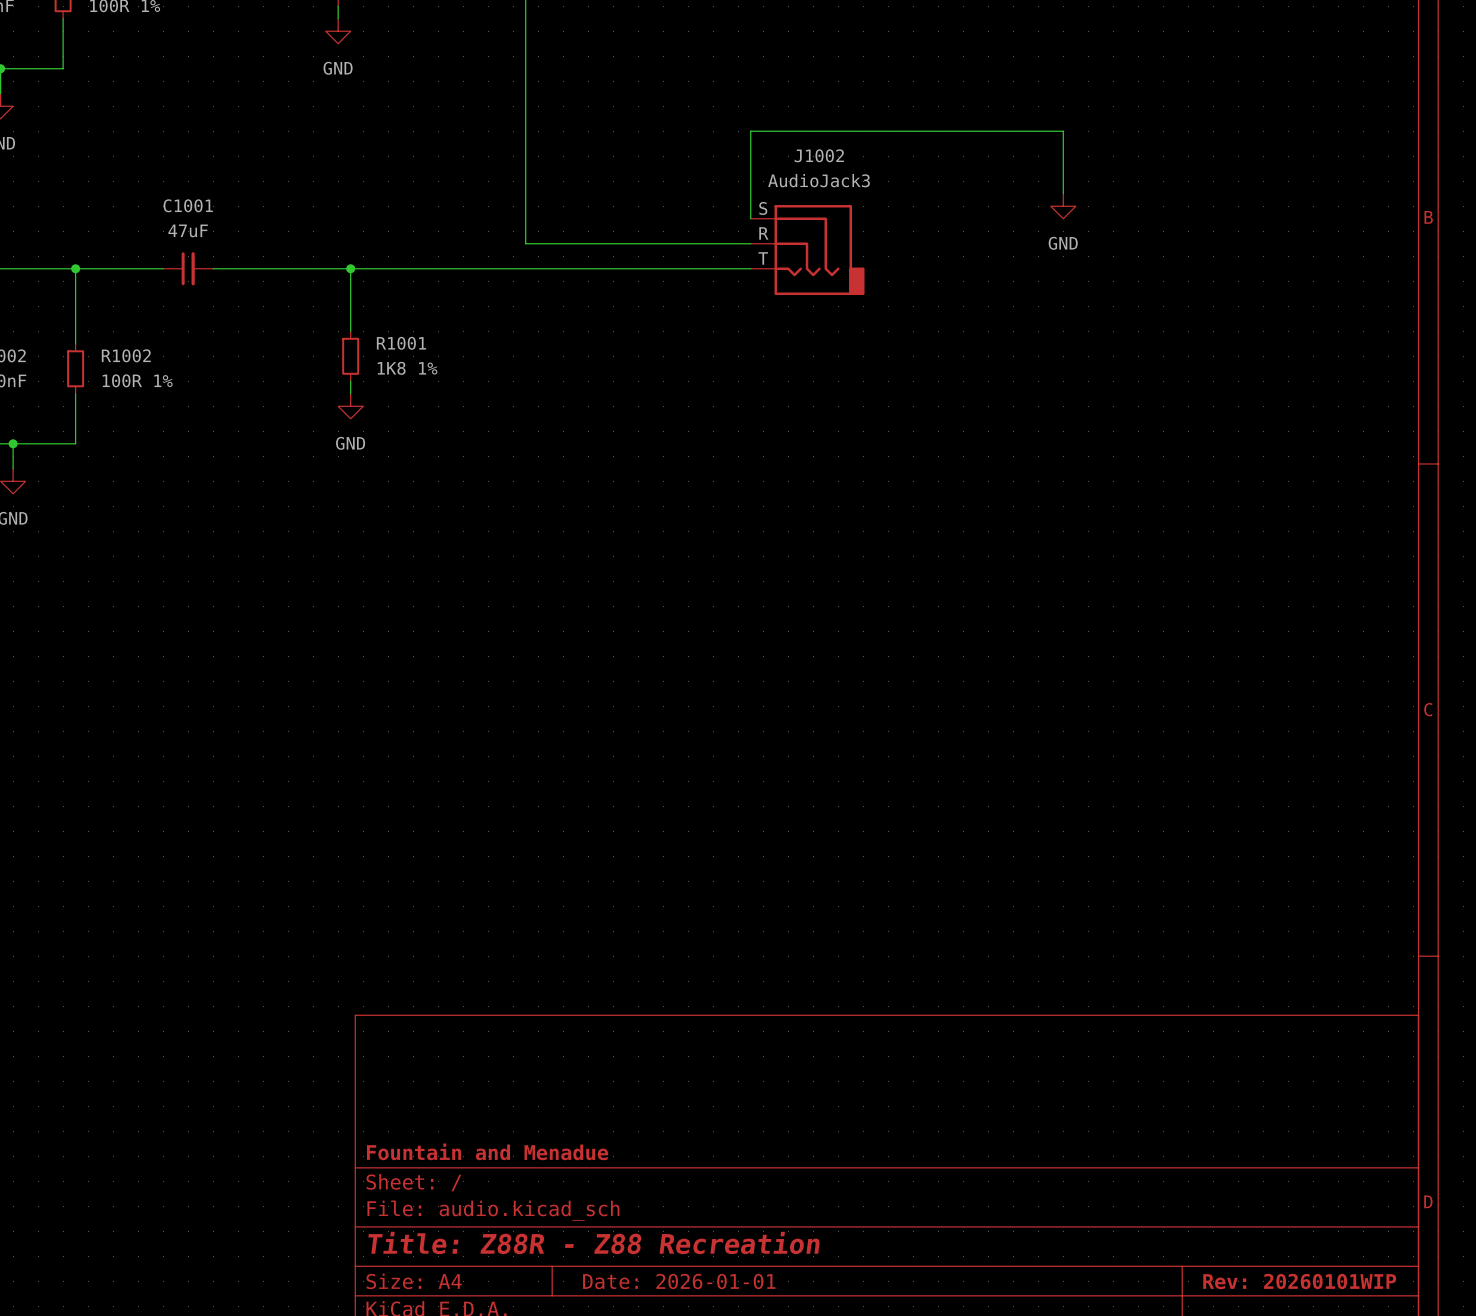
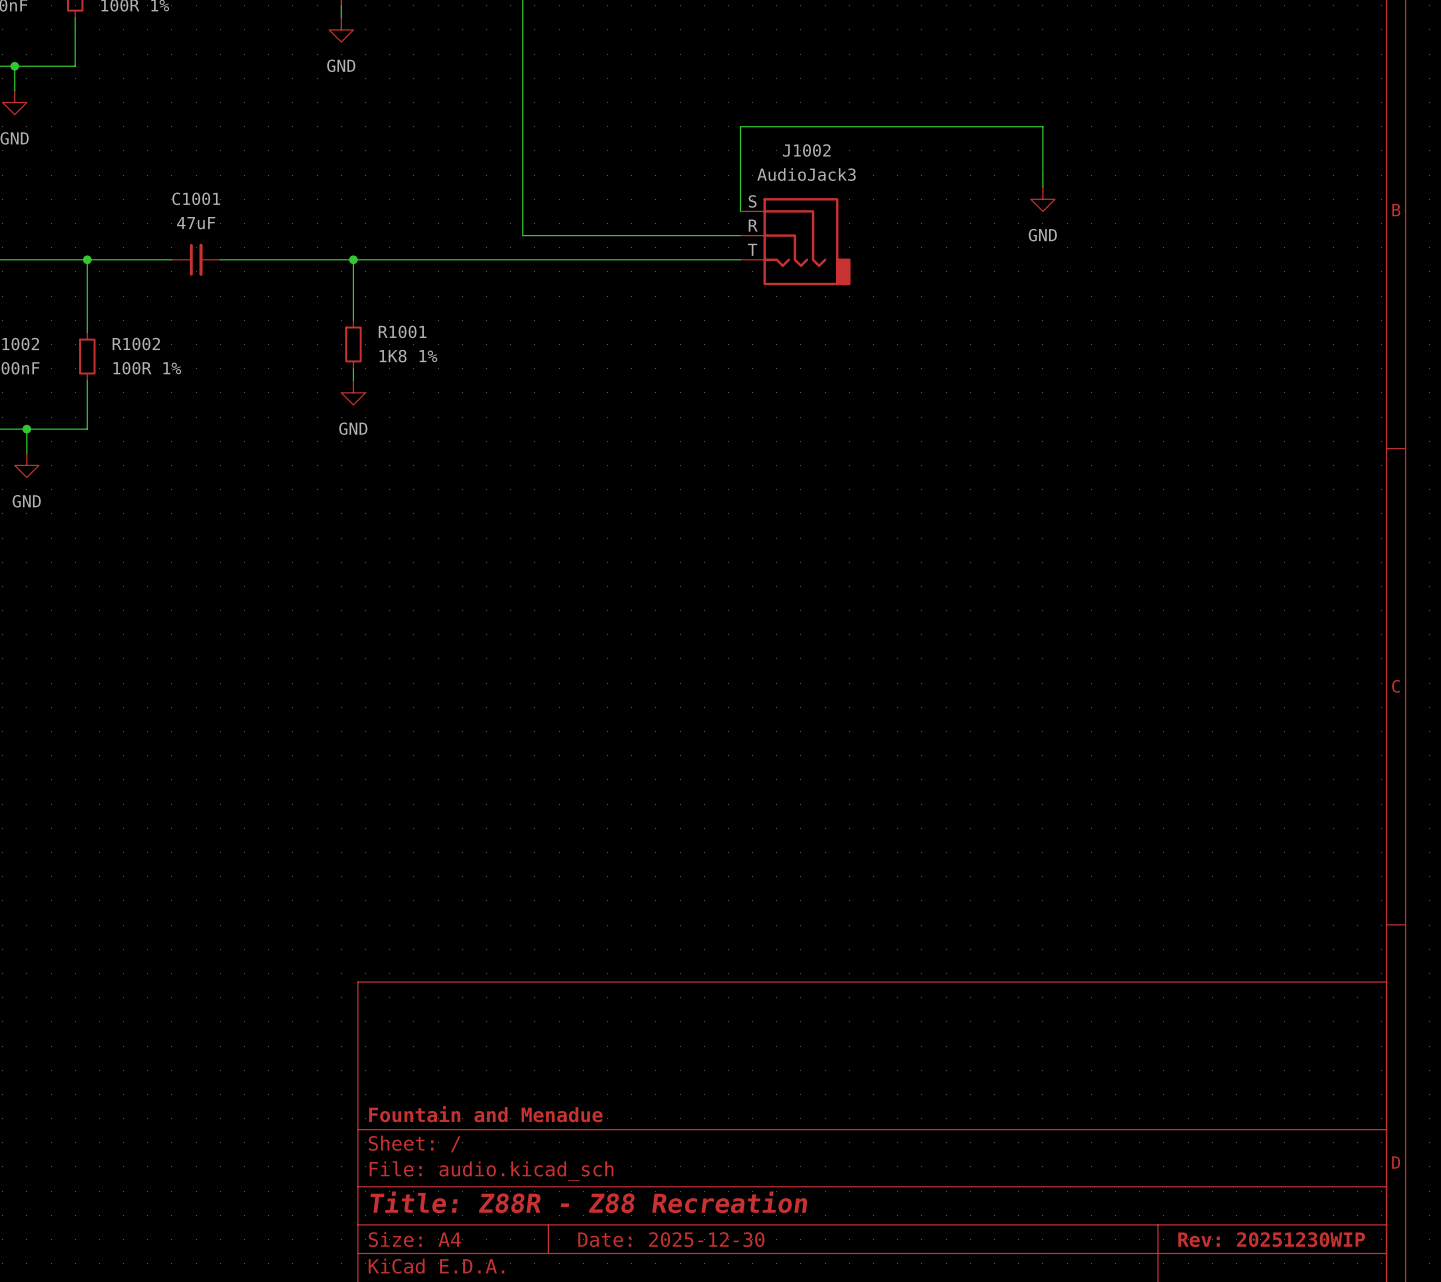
title block: Date: 2026-01-01 (679, 1281) -> Date: 2025-12-30 (671, 1239)
title block: Rev: 20260101WIP (1299, 1281) -> Rev: 20251230WIP (1271, 1239)

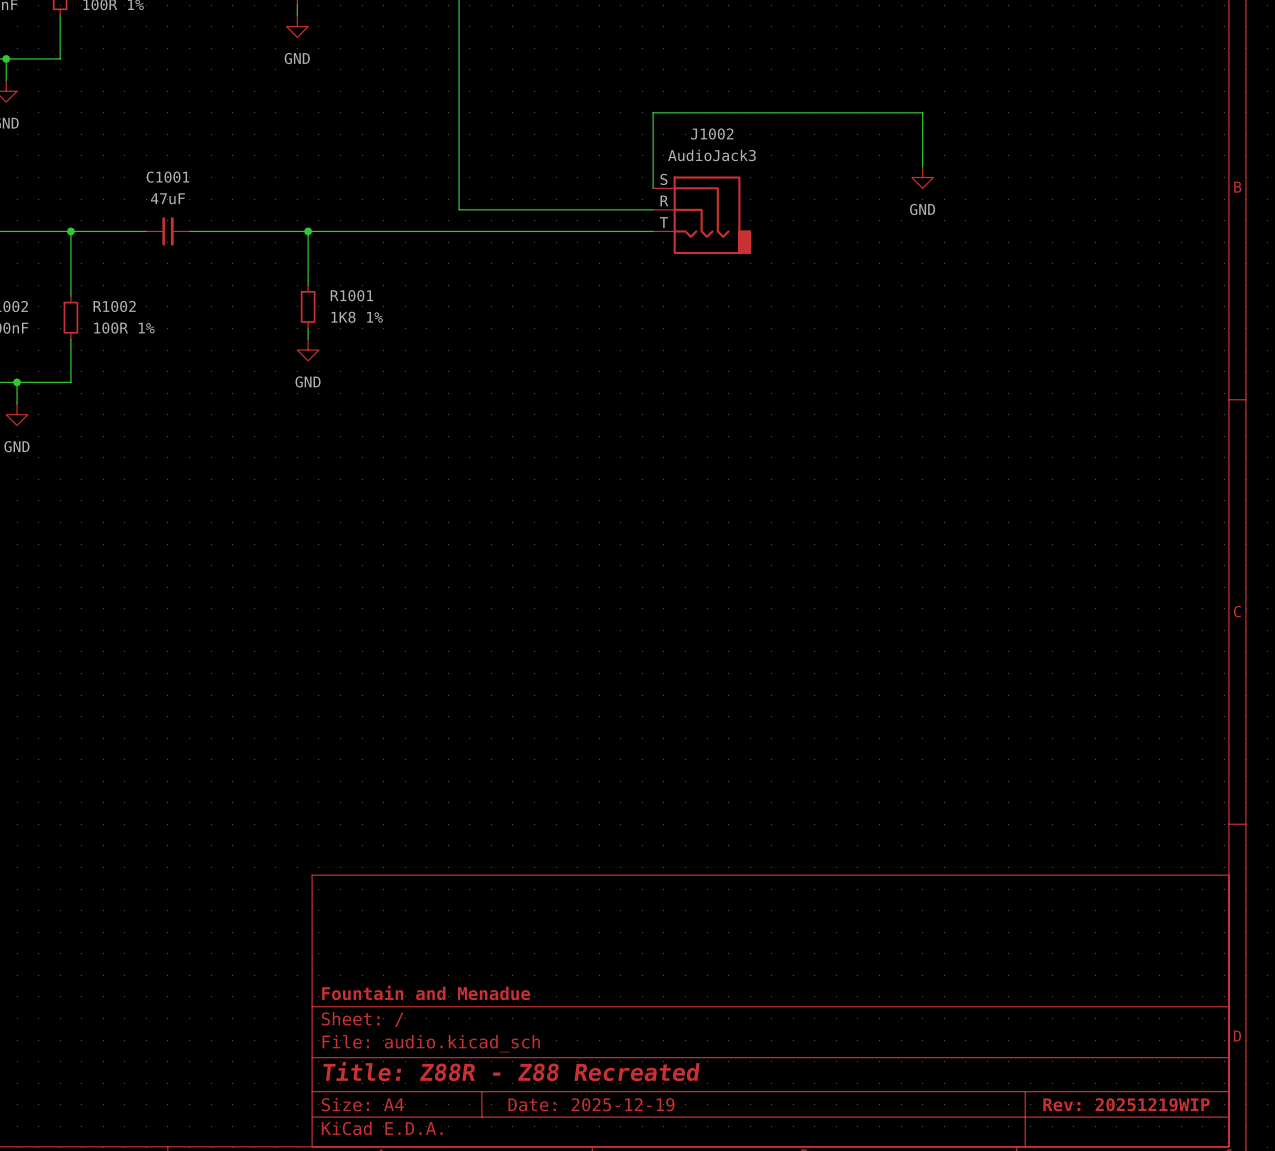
title block: Title: Z88R - Z88 Recreation (588, 1202) -> Title: Z88R - Z88 Recreated (511, 1071)
title block: Date: 2025-12-30 (671, 1239) -> Date: 2025-12-19 (591, 1104)
title block: Rev: 20251230WIP (1271, 1239) -> Rev: 20251219WIP (1126, 1104)

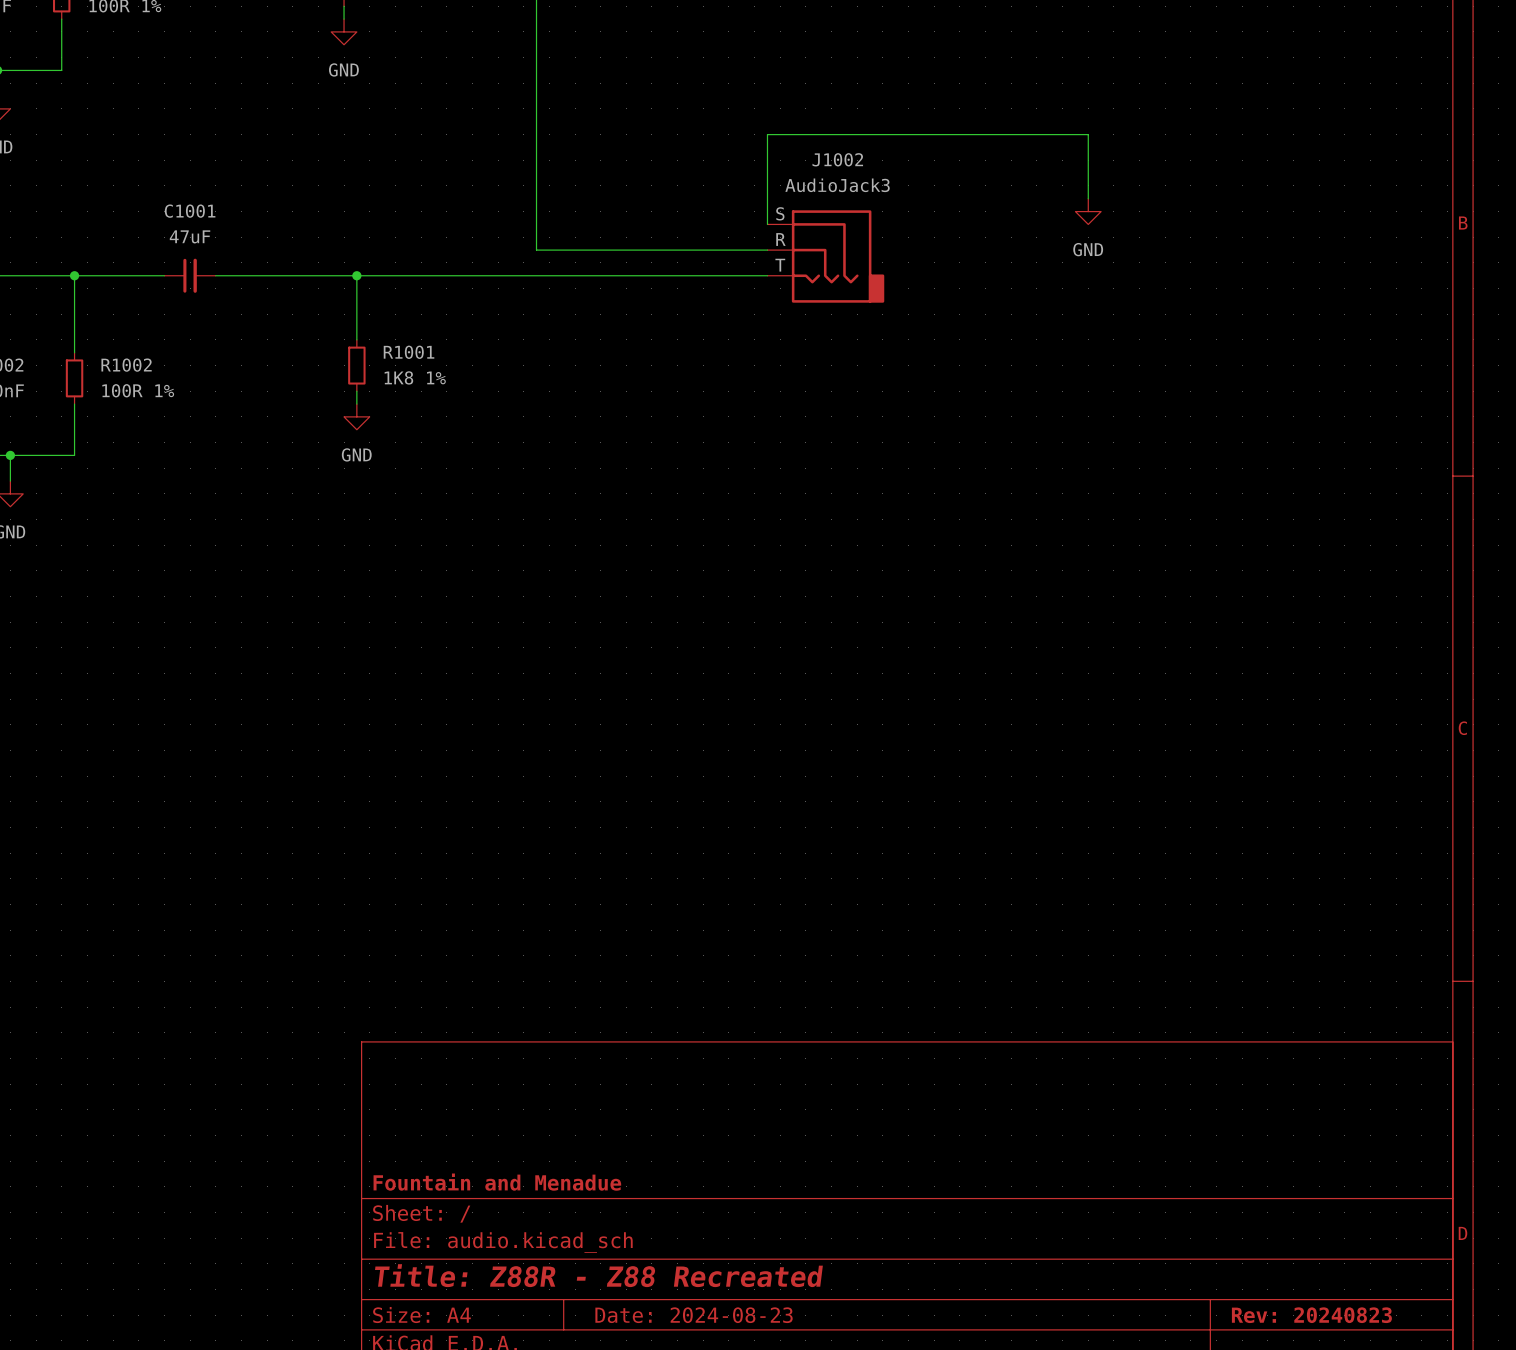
title block: Date: 2025-12-19 (591, 1104) -> Date: 2024-08-23 (694, 1315)
title block: Rev: 20251219WIP (1126, 1104) -> Rev: 20240823 (1311, 1315)

